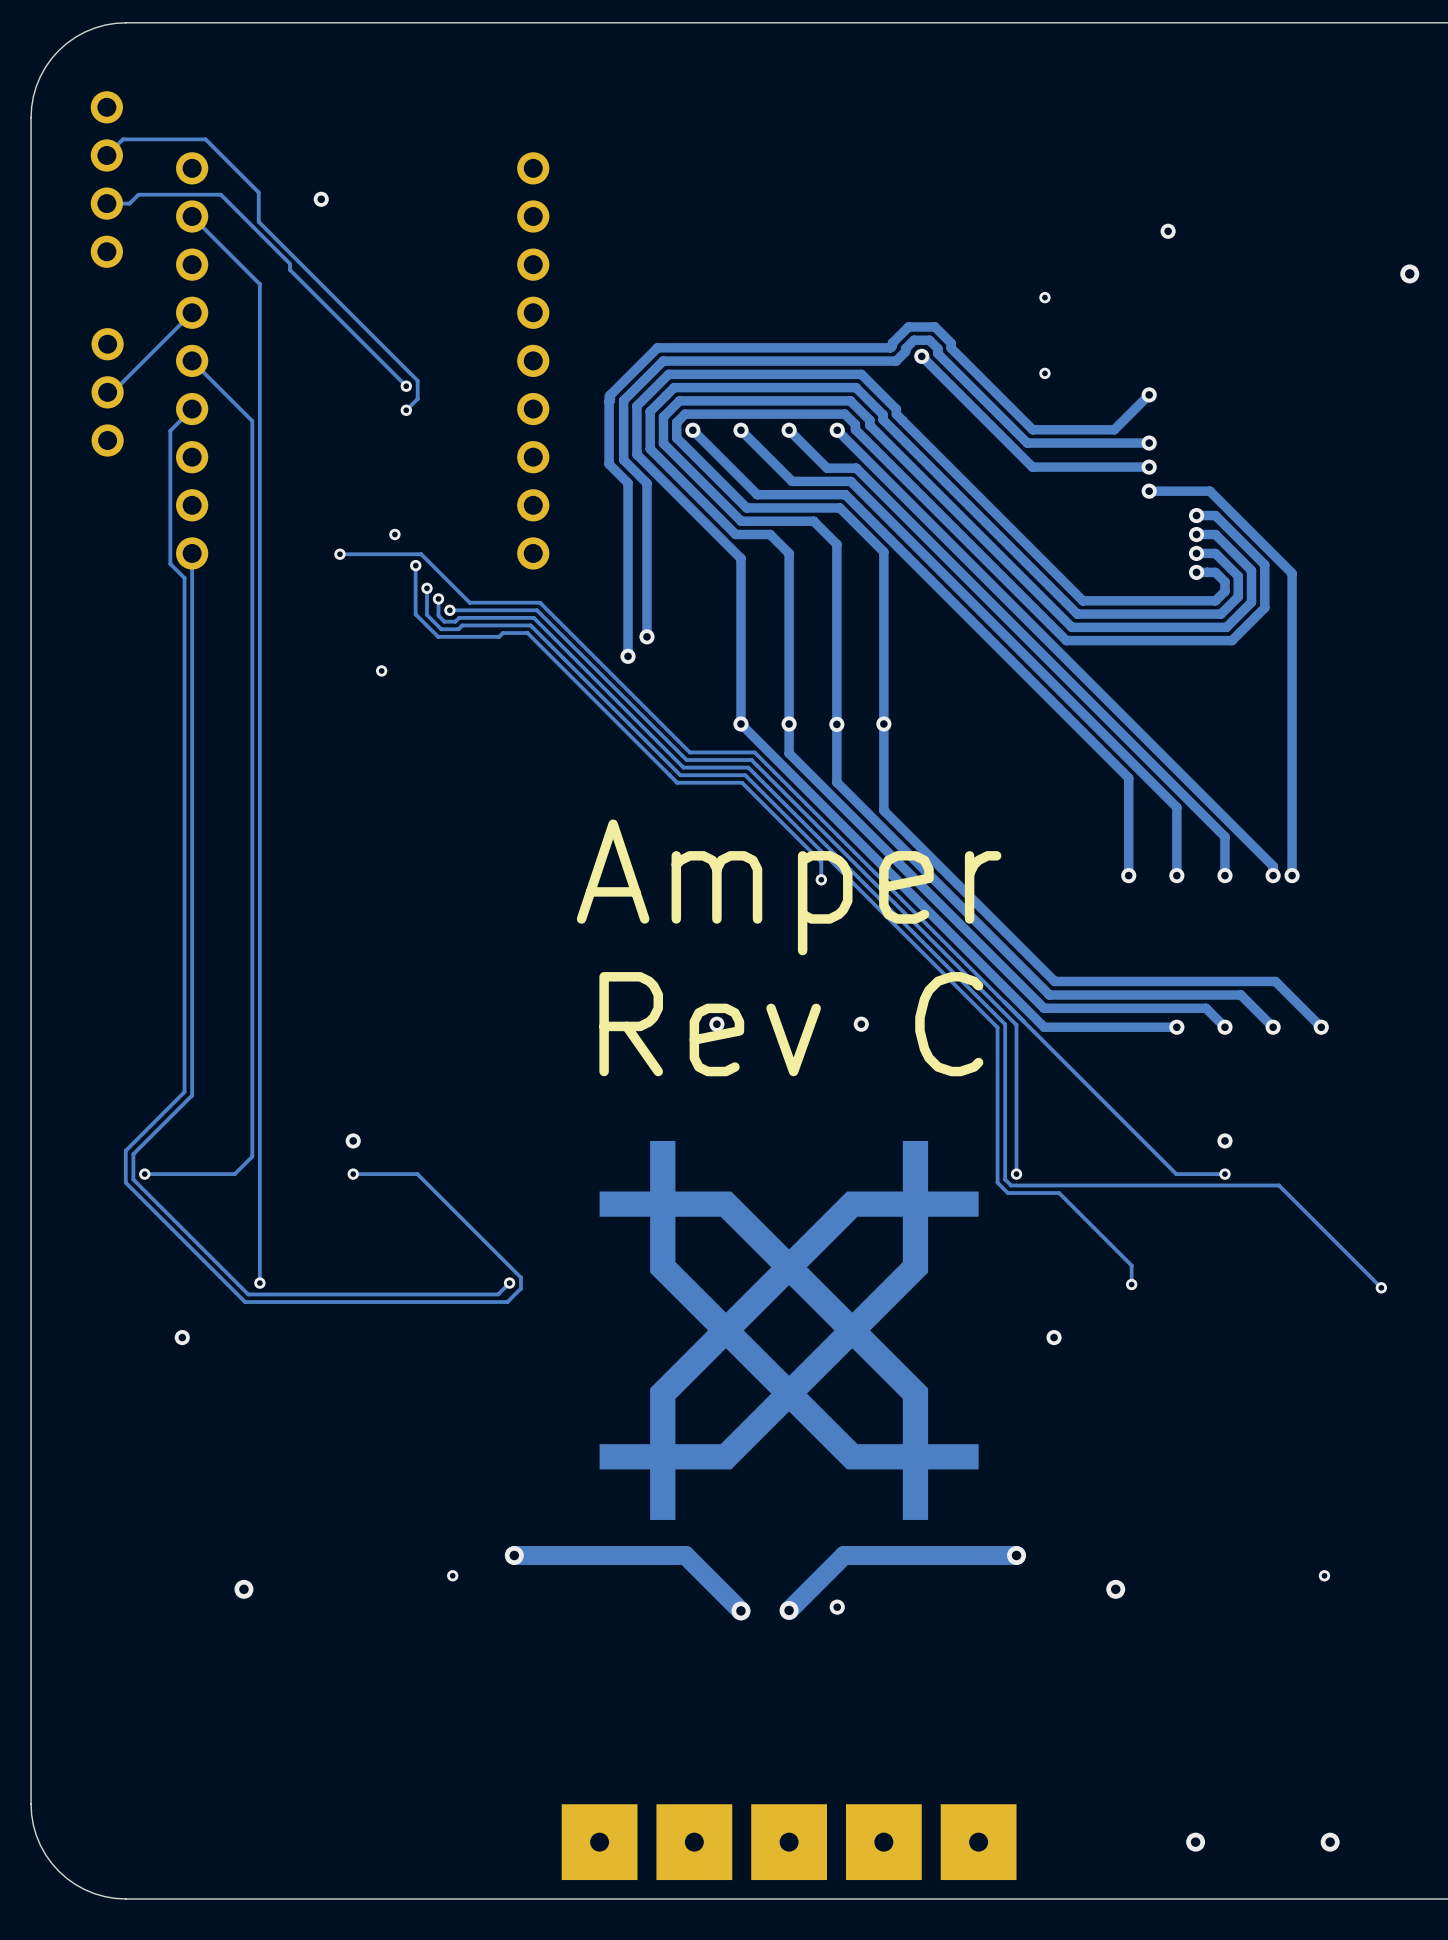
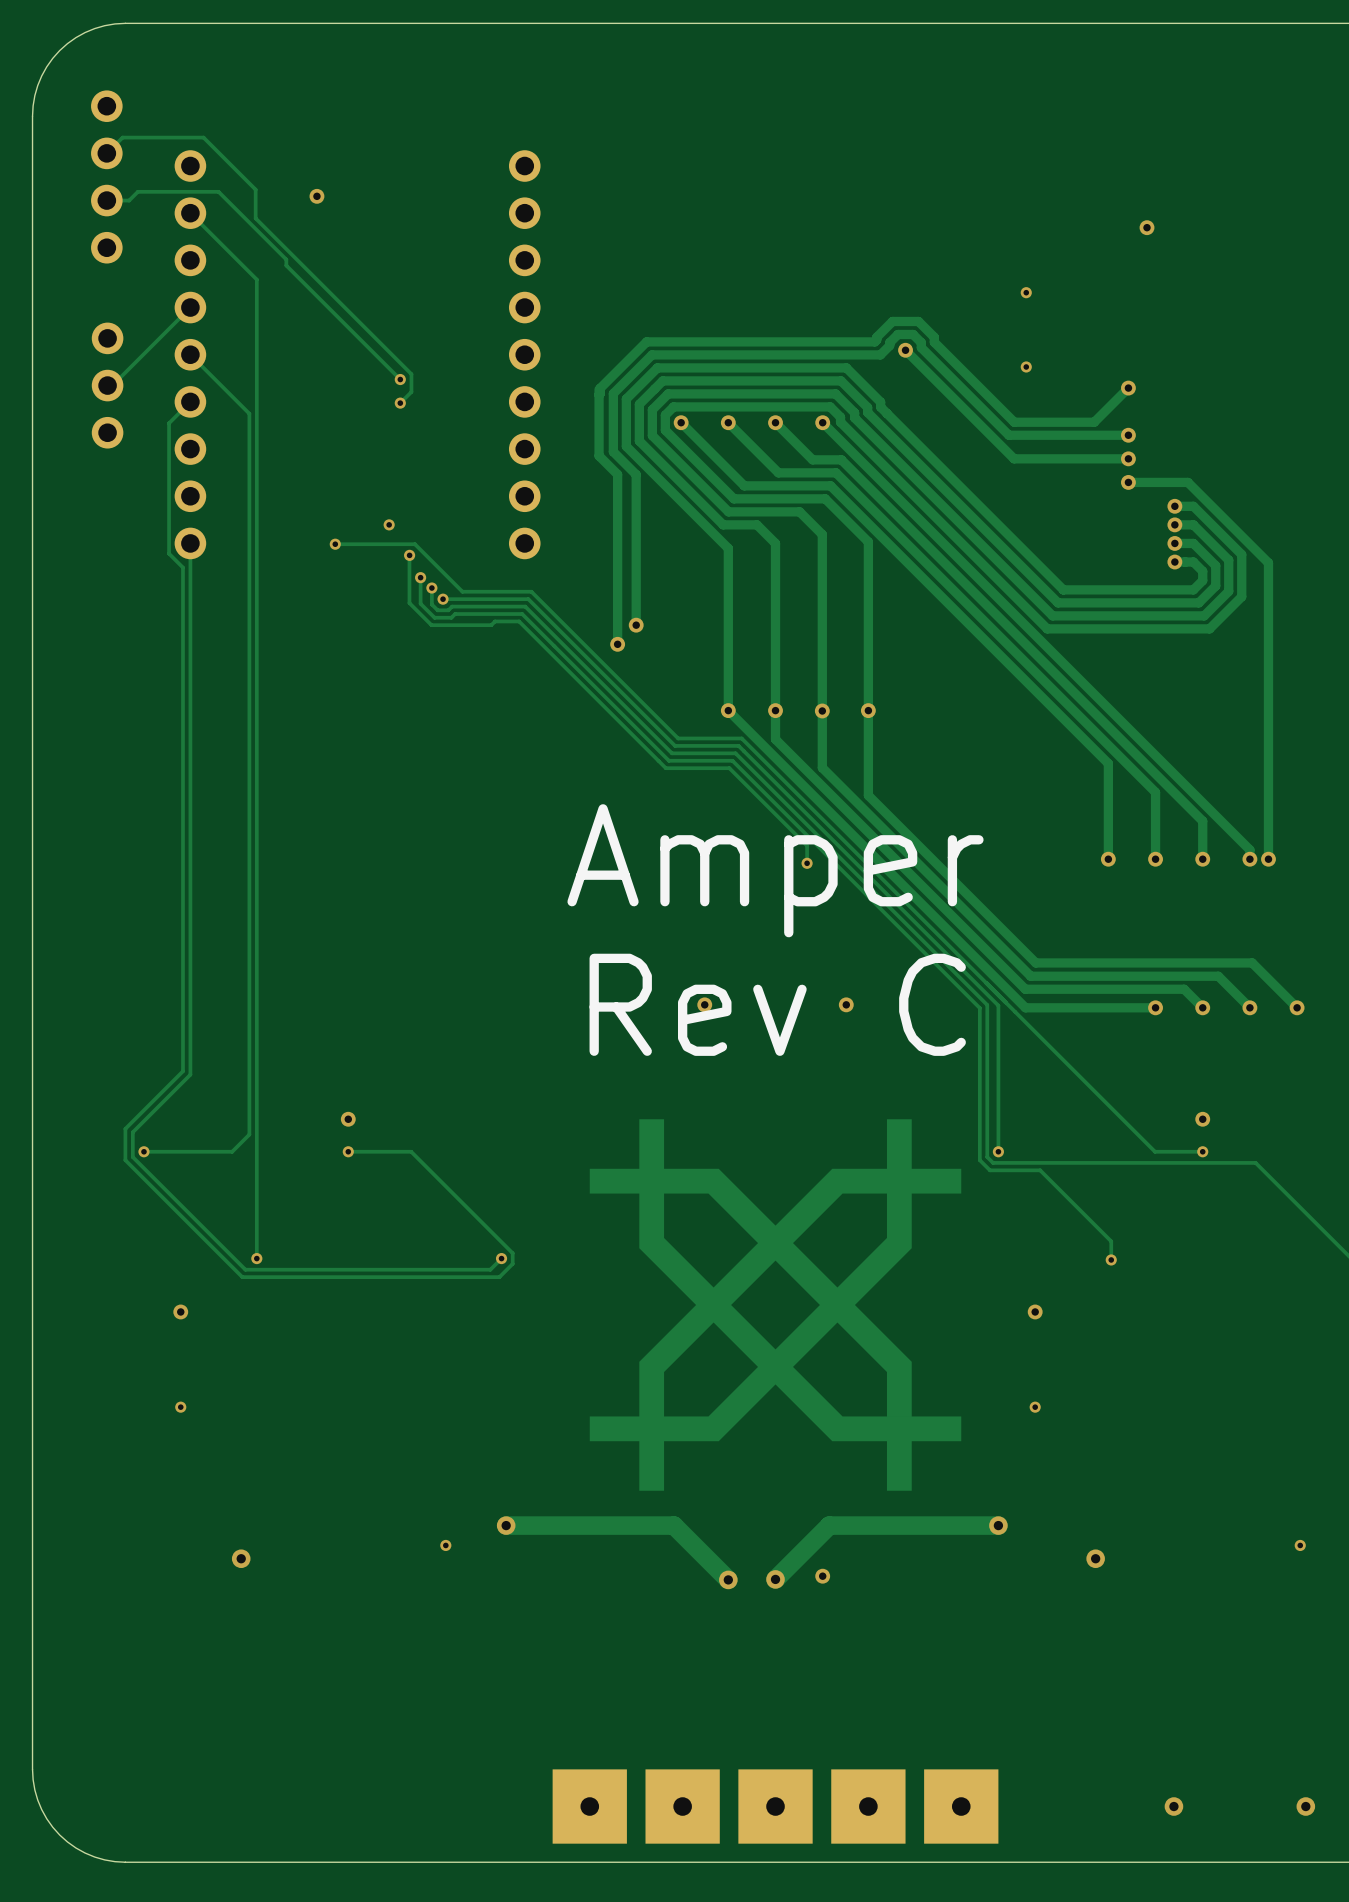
via: (381, 670) -> none
via: none -> (180, 1407)
via: none -> (1035, 1407)

